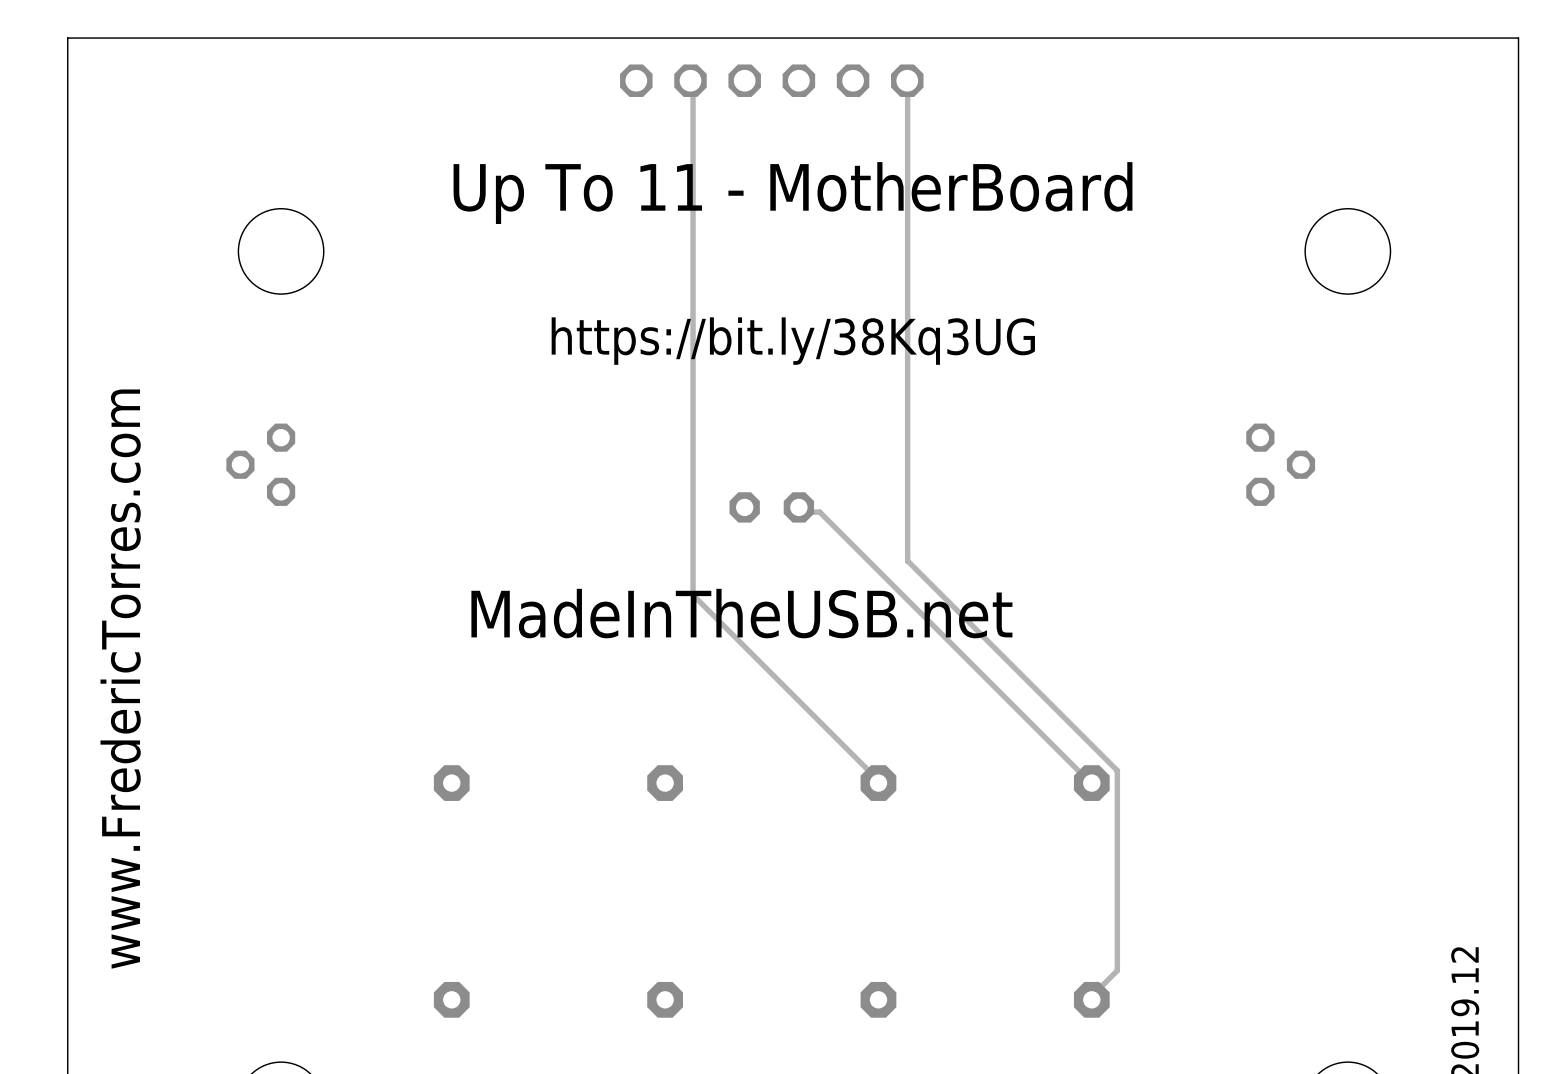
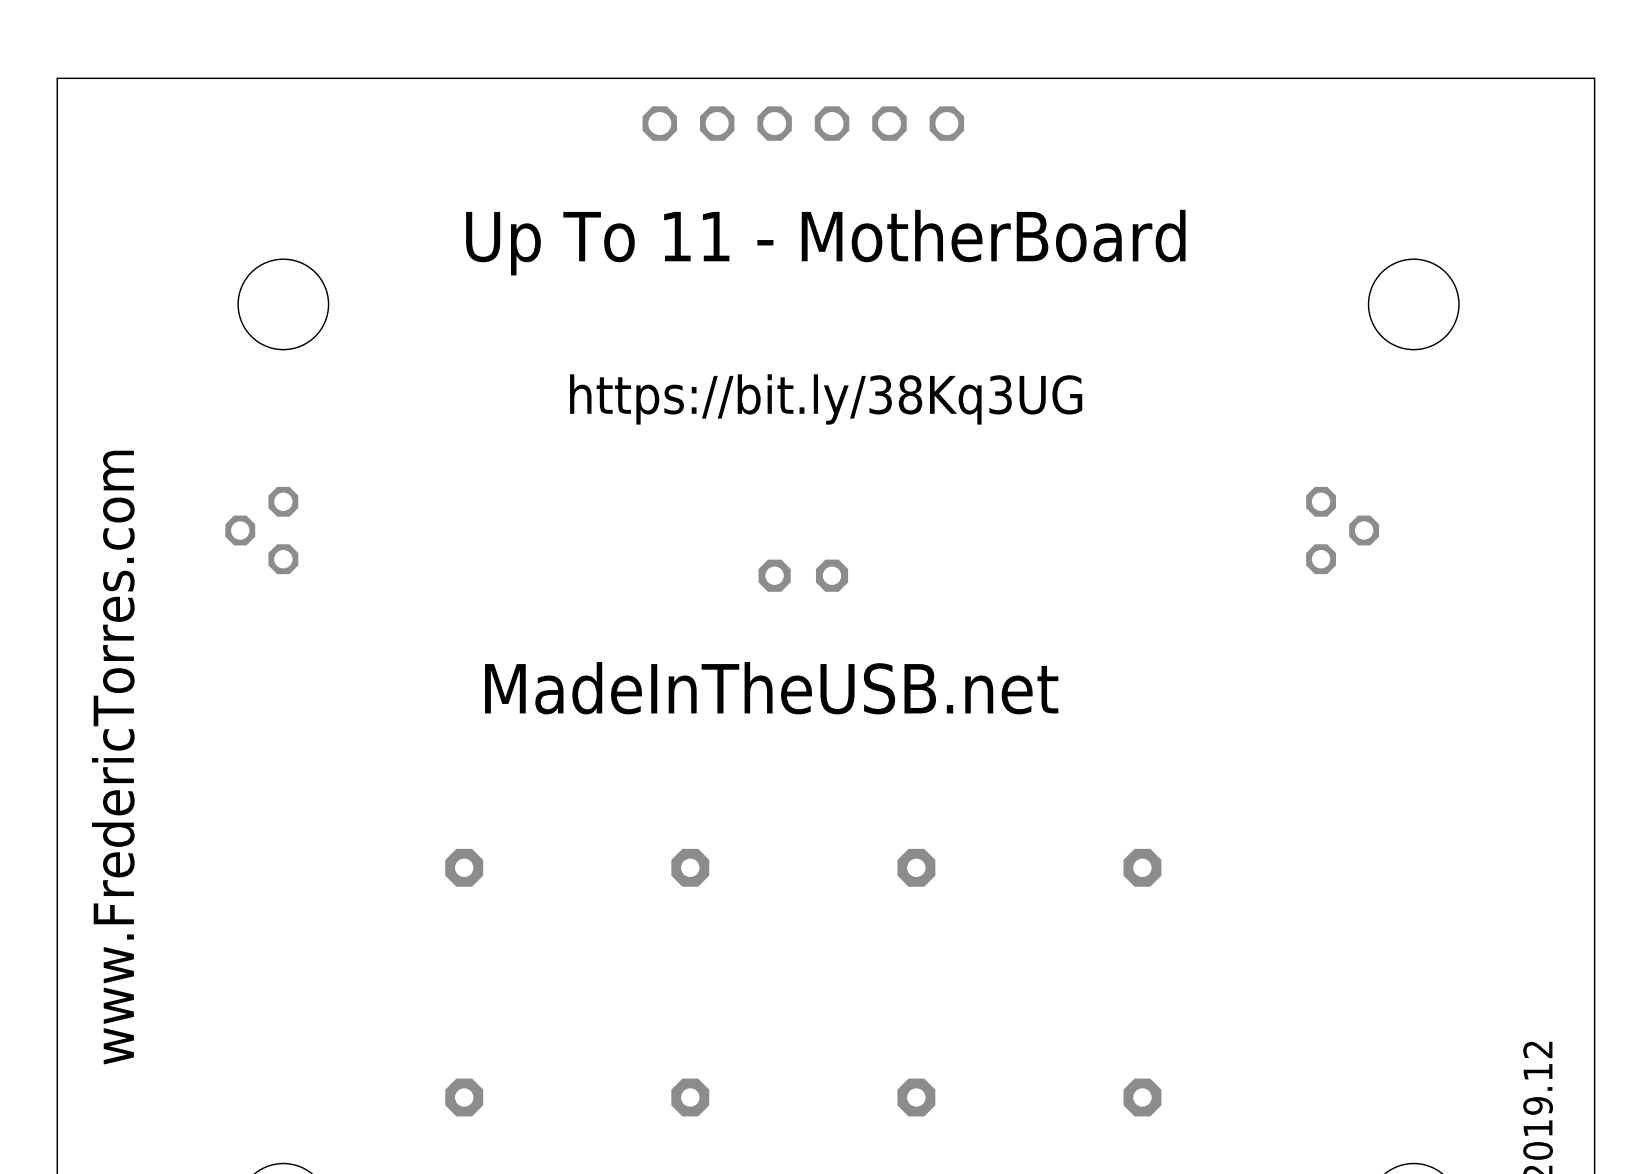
track: (690, 80) (693, 82) (693, 595) (878, 780) (878, 783) -> none
track: (907, 80) (907, 560) (1117, 770) (1117, 970) (1092, 995) (1091, 999) -> none
track: (798, 507) (800, 512) (819, 512) (1091, 783) -> none

